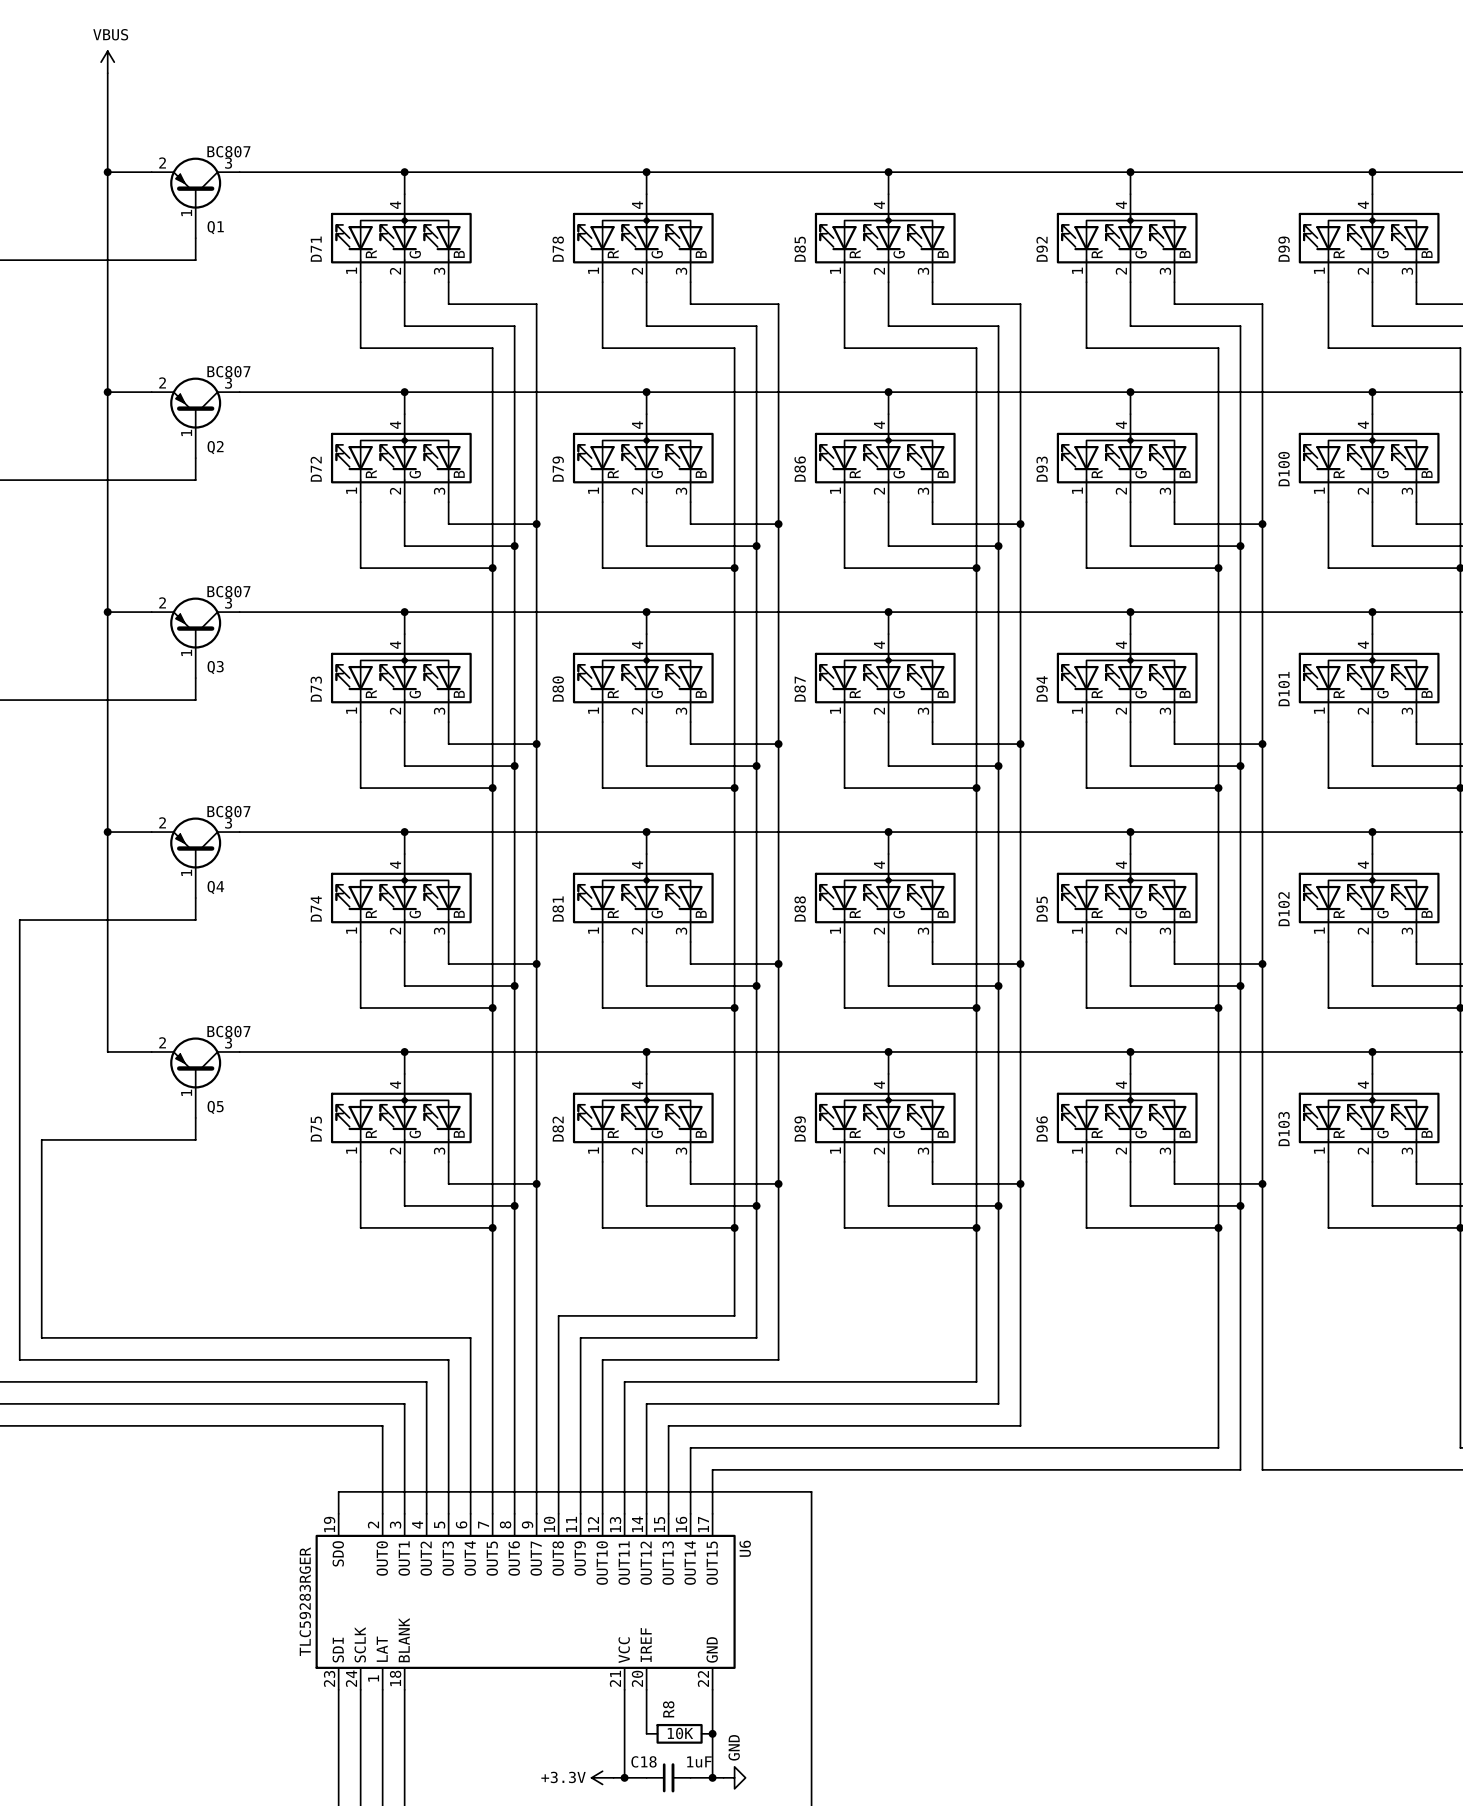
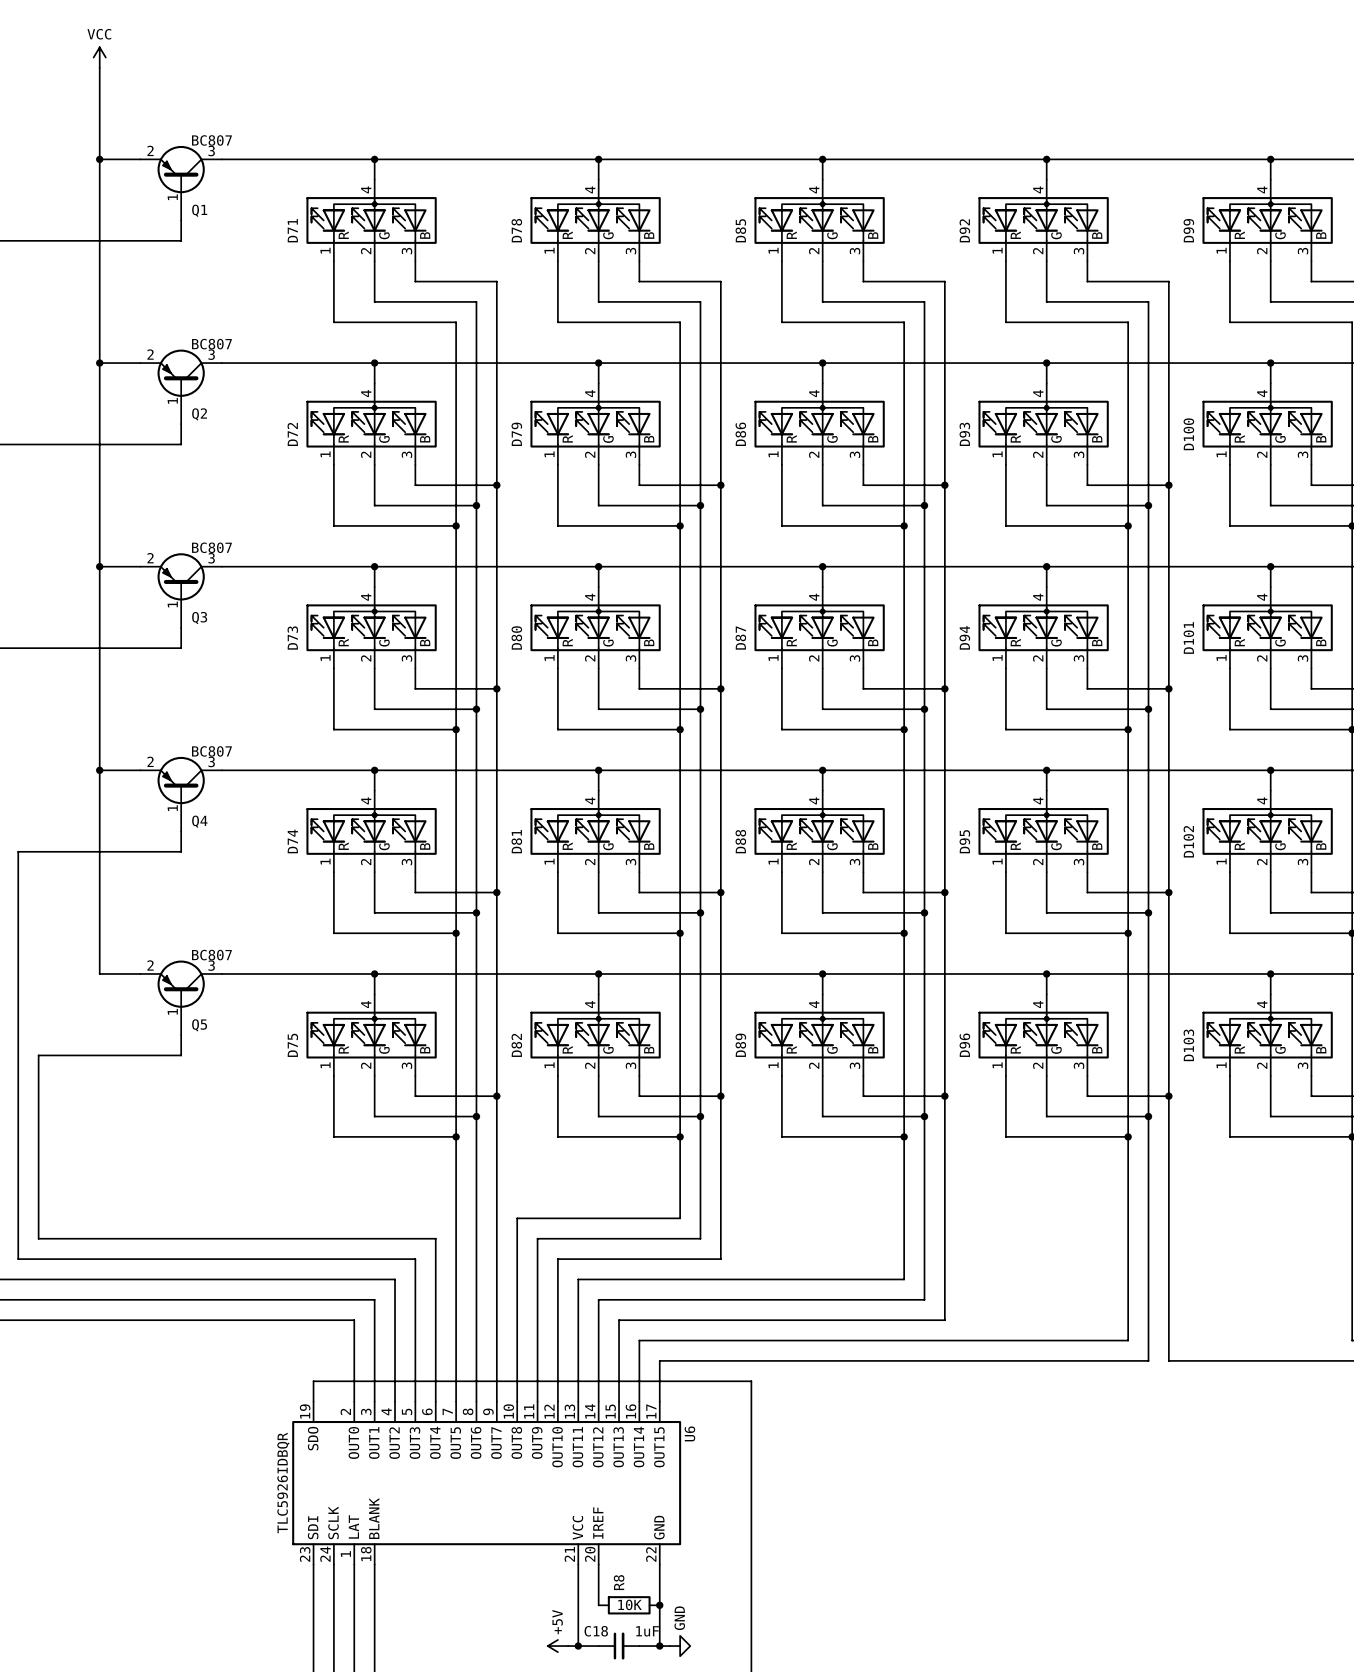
power symbol: VBUS (107, 62) -> VCC (99, 57)
U6 value: TLC59283RGER (305, 1601) -> TLC5926IDBQR (283, 1482)
power symbol: +3.3V (602, 1777) -> +5V (557, 1646)

